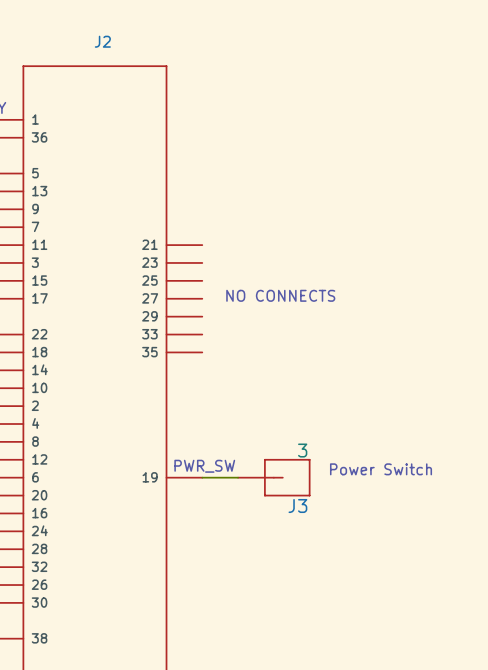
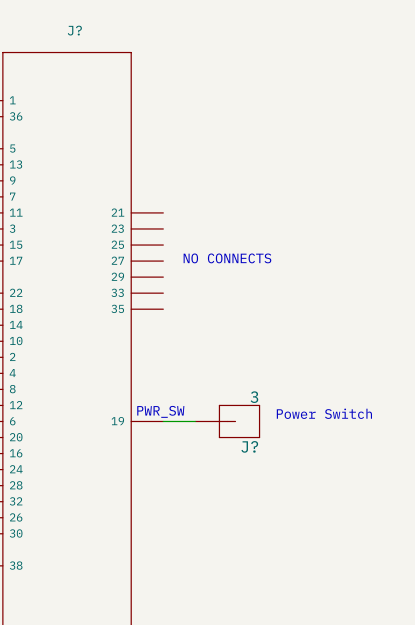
J2 name: J2 (102, 41) -> J? (74, 30)
J3 name: J3 (297, 506) -> J? (249, 446)

